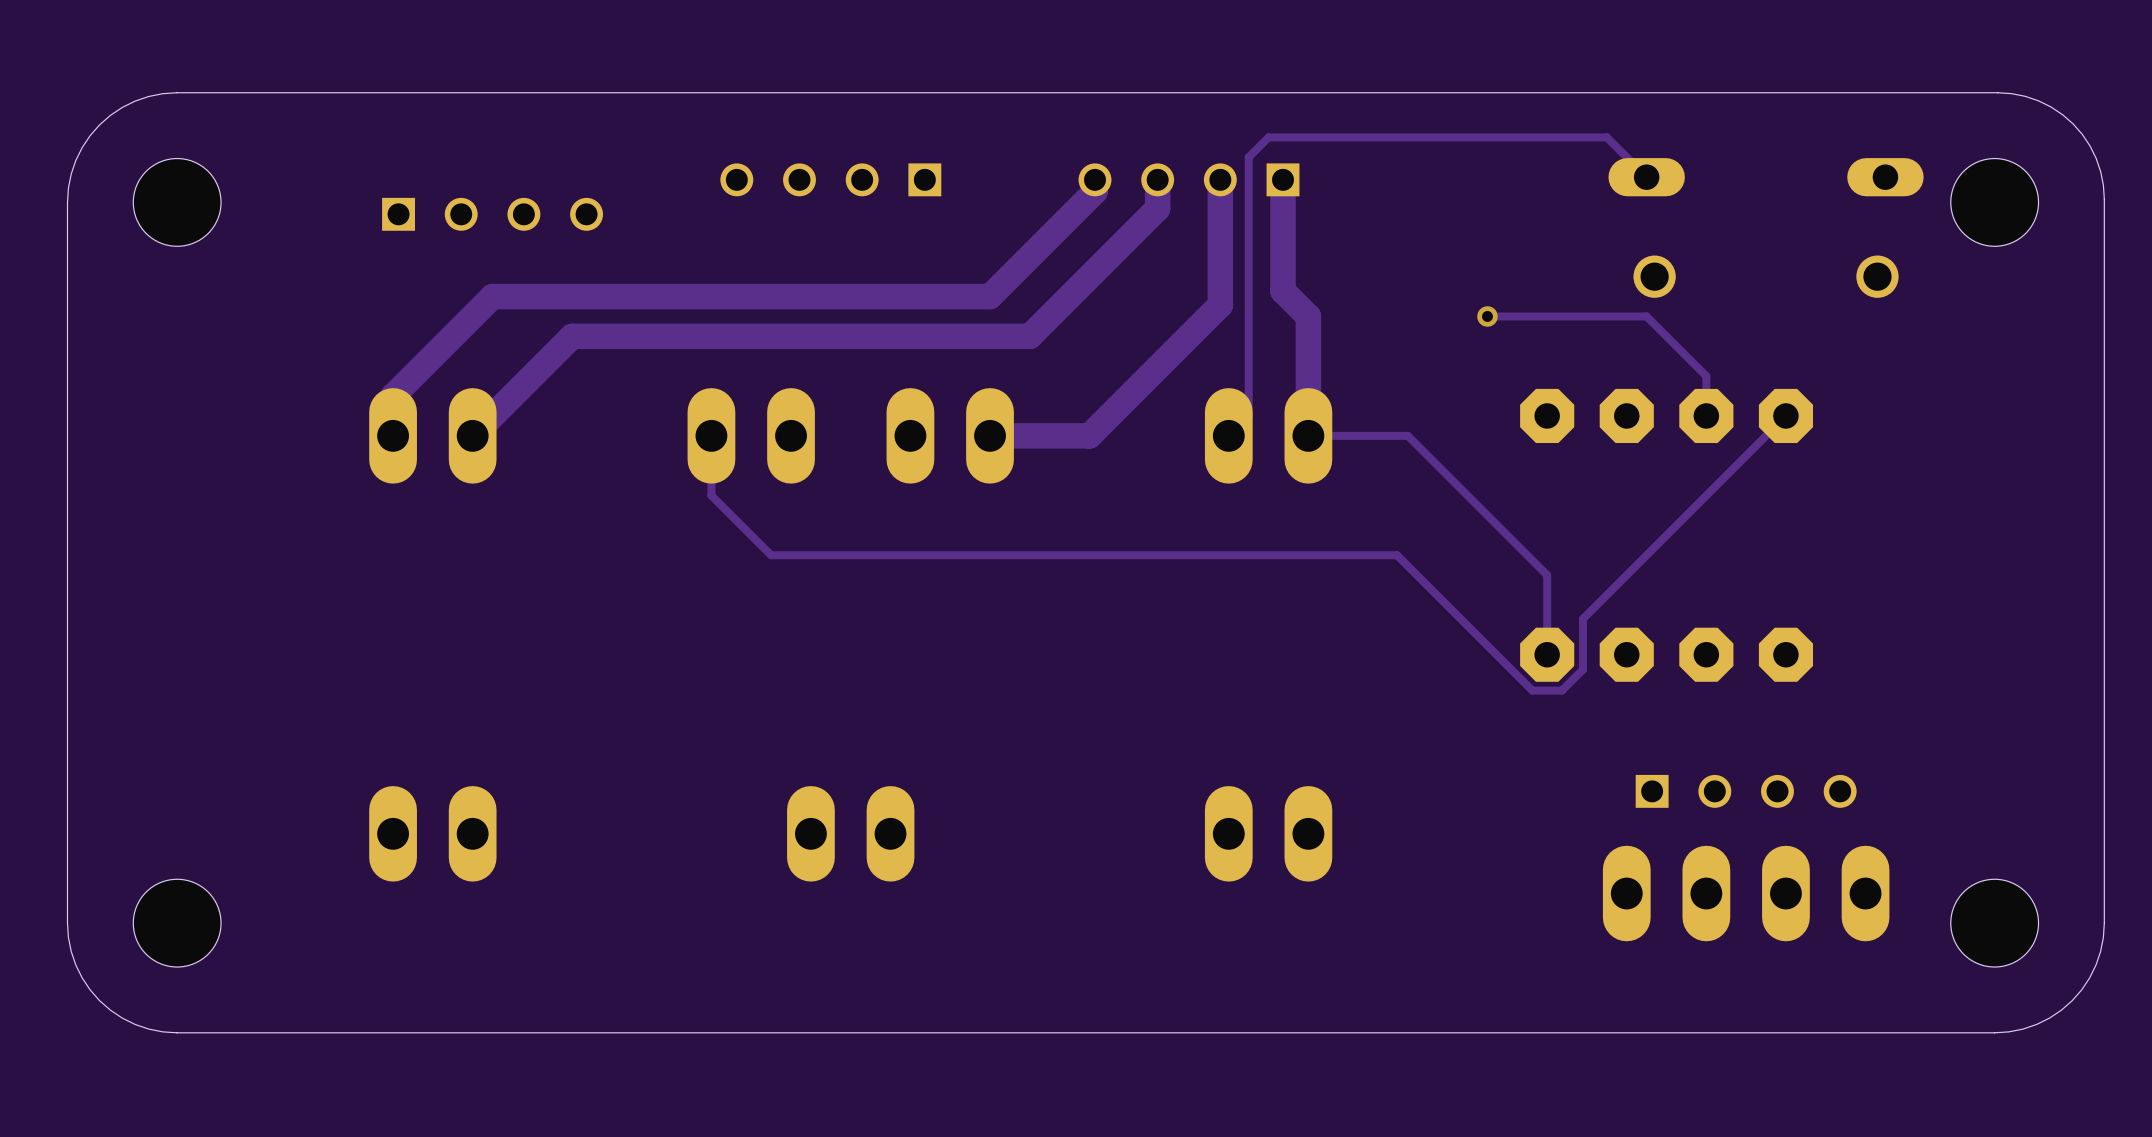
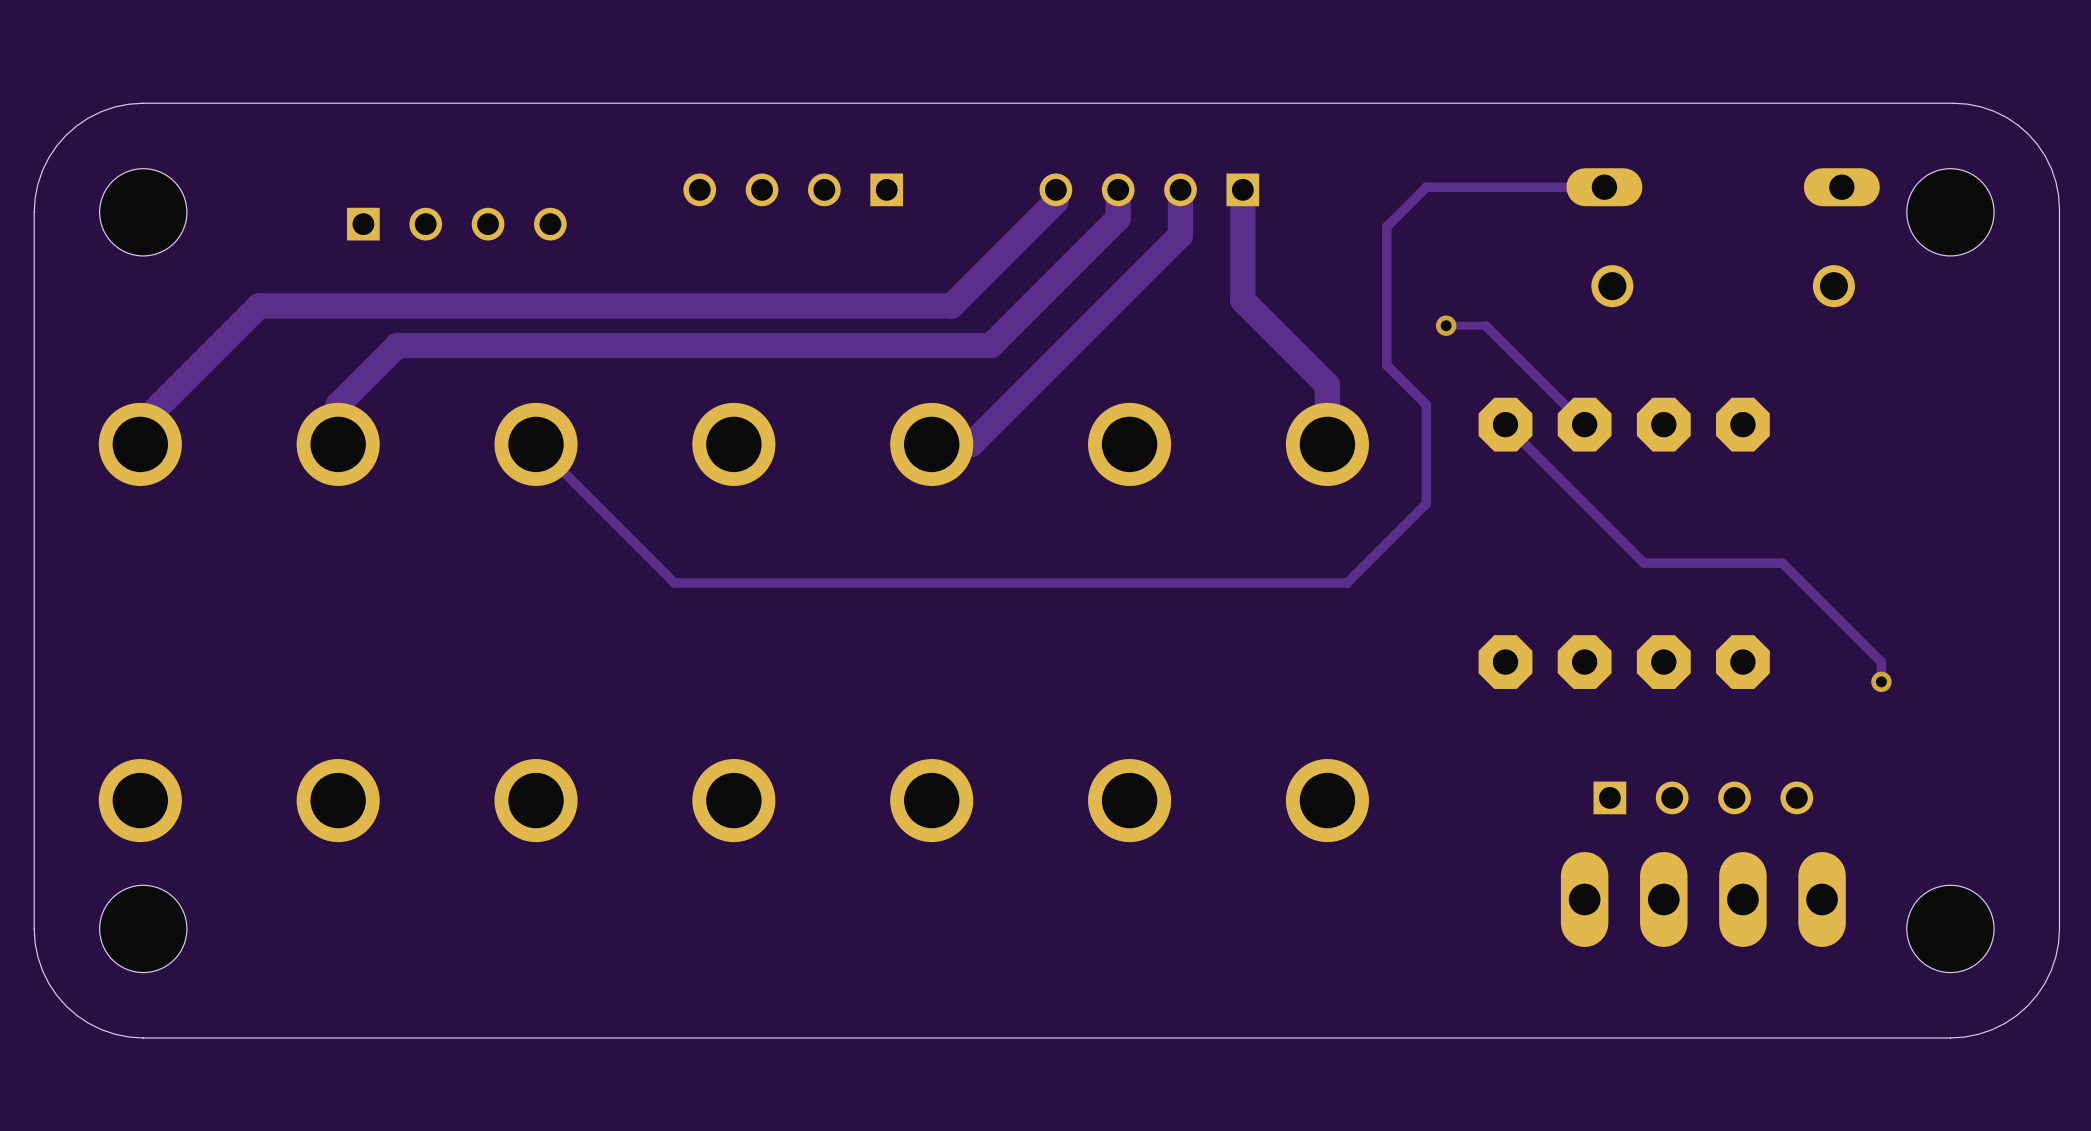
track: (1646, 177) (1606, 137) (1268, 137) (1248, 157) (1248, 415) (1228, 435) -> (1604, 187) (1426, 187) (1386, 226) (1386, 365) (1426, 404) (1426, 503) (1347, 582) (674, 582) (536, 444)
track: (1220, 225) (1220, 305) (1089, 435) (1009, 435) -> (1180, 235) (971, 444)
track: (492, 296) (393, 396) (393, 435) -> (456, 305) (259, 305) (140, 424) (140, 444)
track: (1308, 316) (1308, 435) (1407, 435) (1547, 575) (1547, 654) -> (1268, 325) (1327, 385) (1327, 444)
track: (1527, 316) (1646, 316) (1706, 376) (1706, 415) -> (1485, 325) (1584, 424)
track: (572, 336) (472, 435) -> (536, 345) (397, 345) (338, 404) (338, 444)
part footprint: [687, 388, 815, 484] -> [692, 402, 776, 486]
part footprint: [886, 388, 1014, 484] -> [890, 402, 974, 486]
track: none -> (1505, 424) (1644, 563) (1782, 563) (1881, 662) (1881, 681)
track: (1785, 415) (1582, 618) (1582, 669) (1562, 690) (1532, 690) (1397, 555) (771, 555) (711, 495) (711, 435) -> none
part: none -> (140, 444)
part: none -> (338, 444)
part: (432, 435) -> none
part: none -> (536, 444)
part: none -> (1129, 444)
part: (1268, 435) -> none
part: none -> (1327, 444)
via: none -> (1881, 681)
part: none -> (140, 800)
part: none -> (338, 800)
part: none -> (536, 800)
part: none -> (733, 800)
part: none -> (931, 800)
part: none -> (1129, 800)
part: none -> (1327, 800)
part: (432, 833) -> none
part: (850, 833) -> none
part: (1268, 833) -> none

